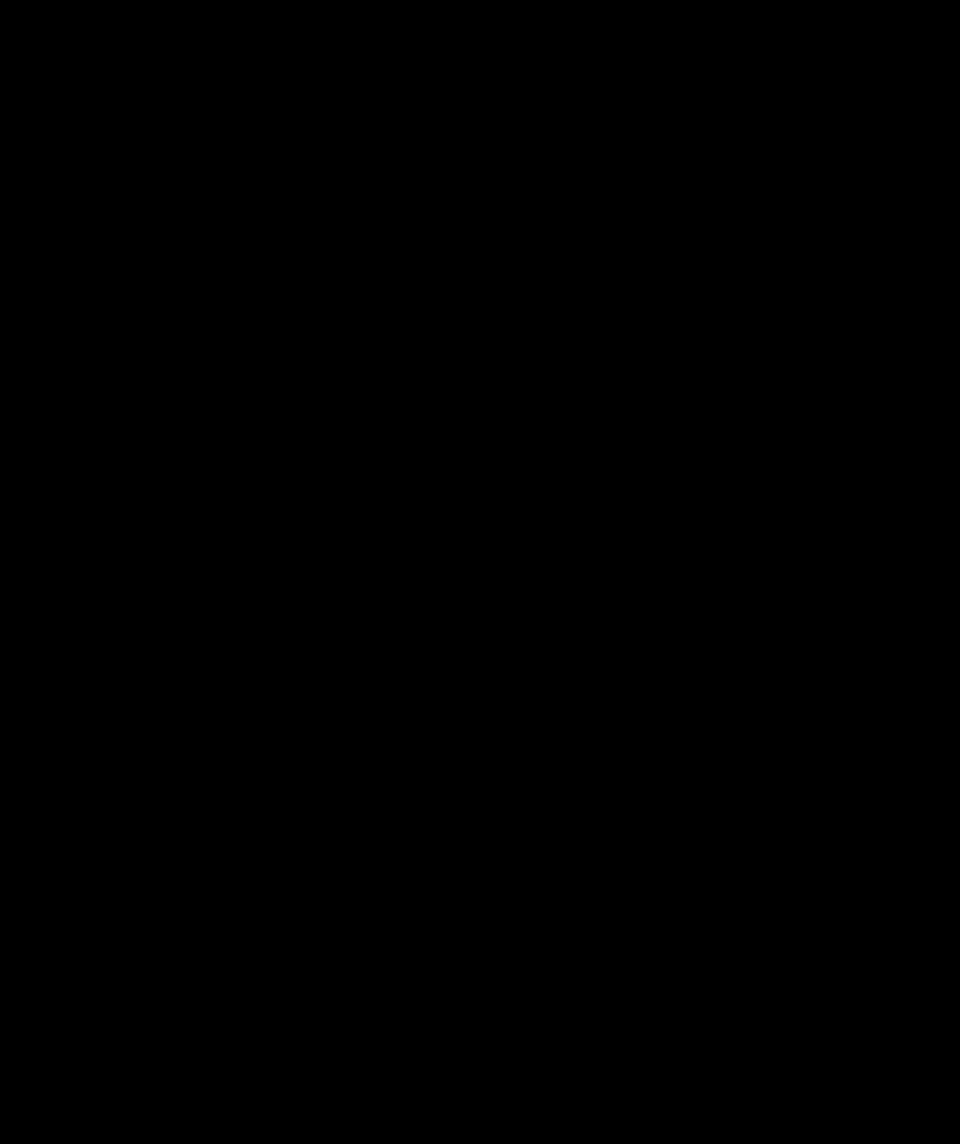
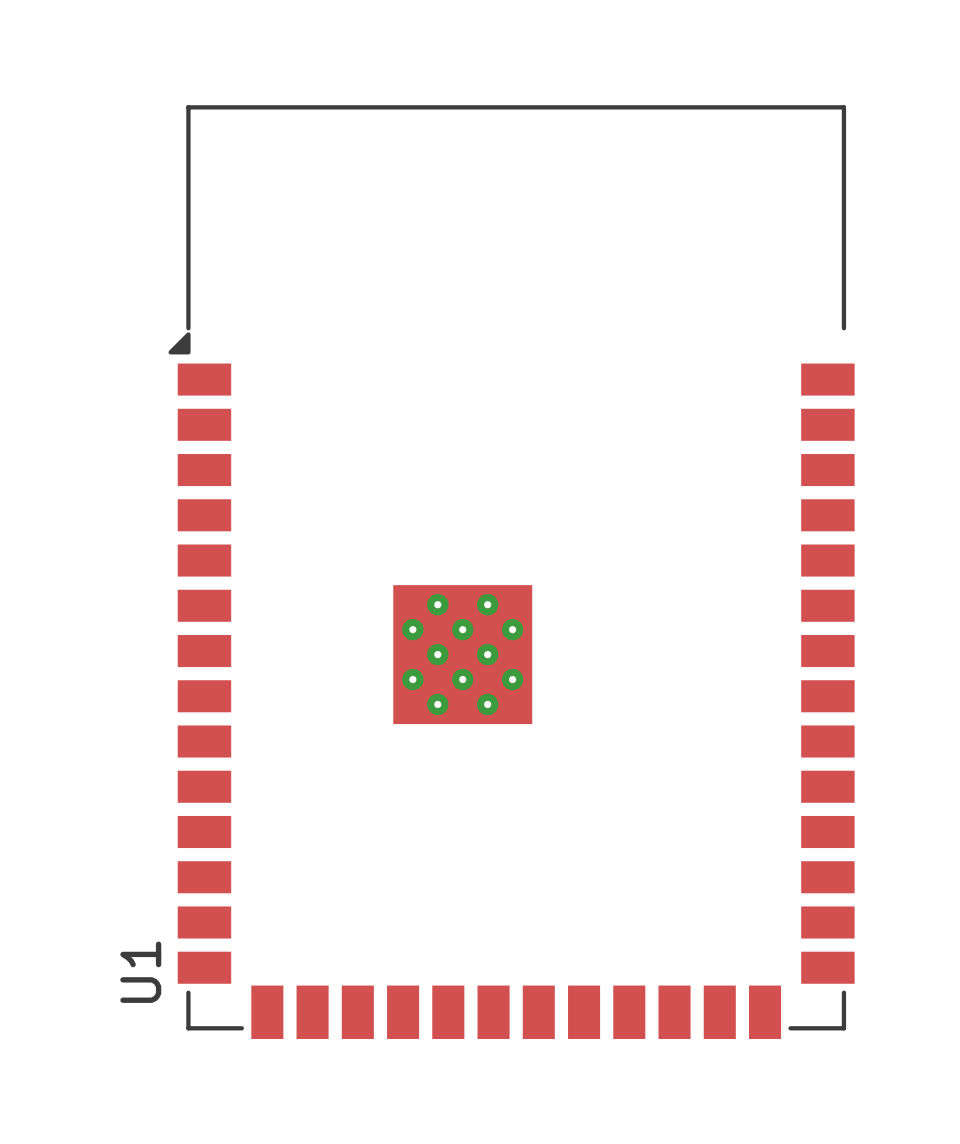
U1: none -> (511, 572)

